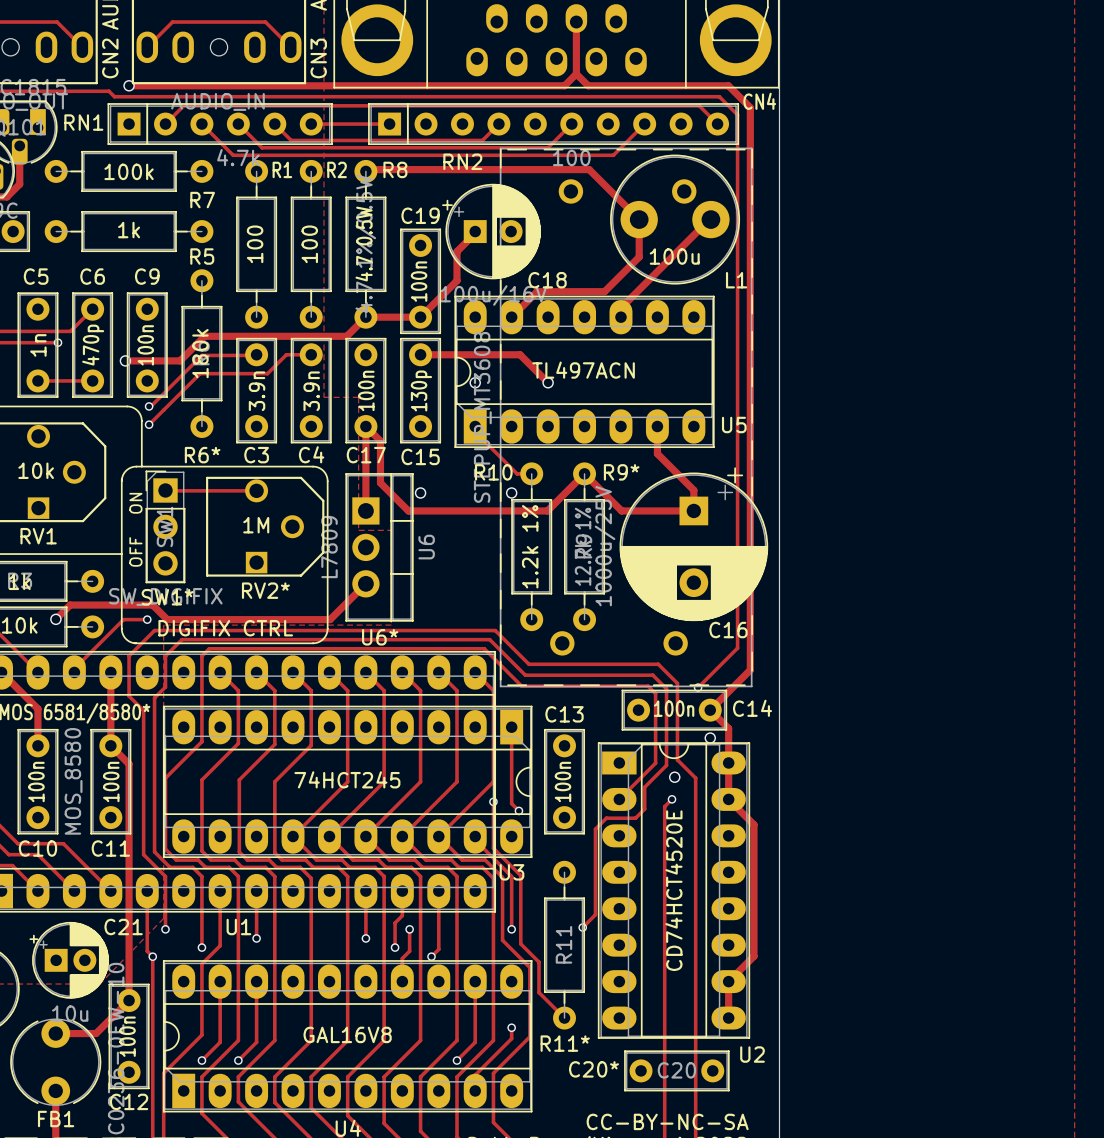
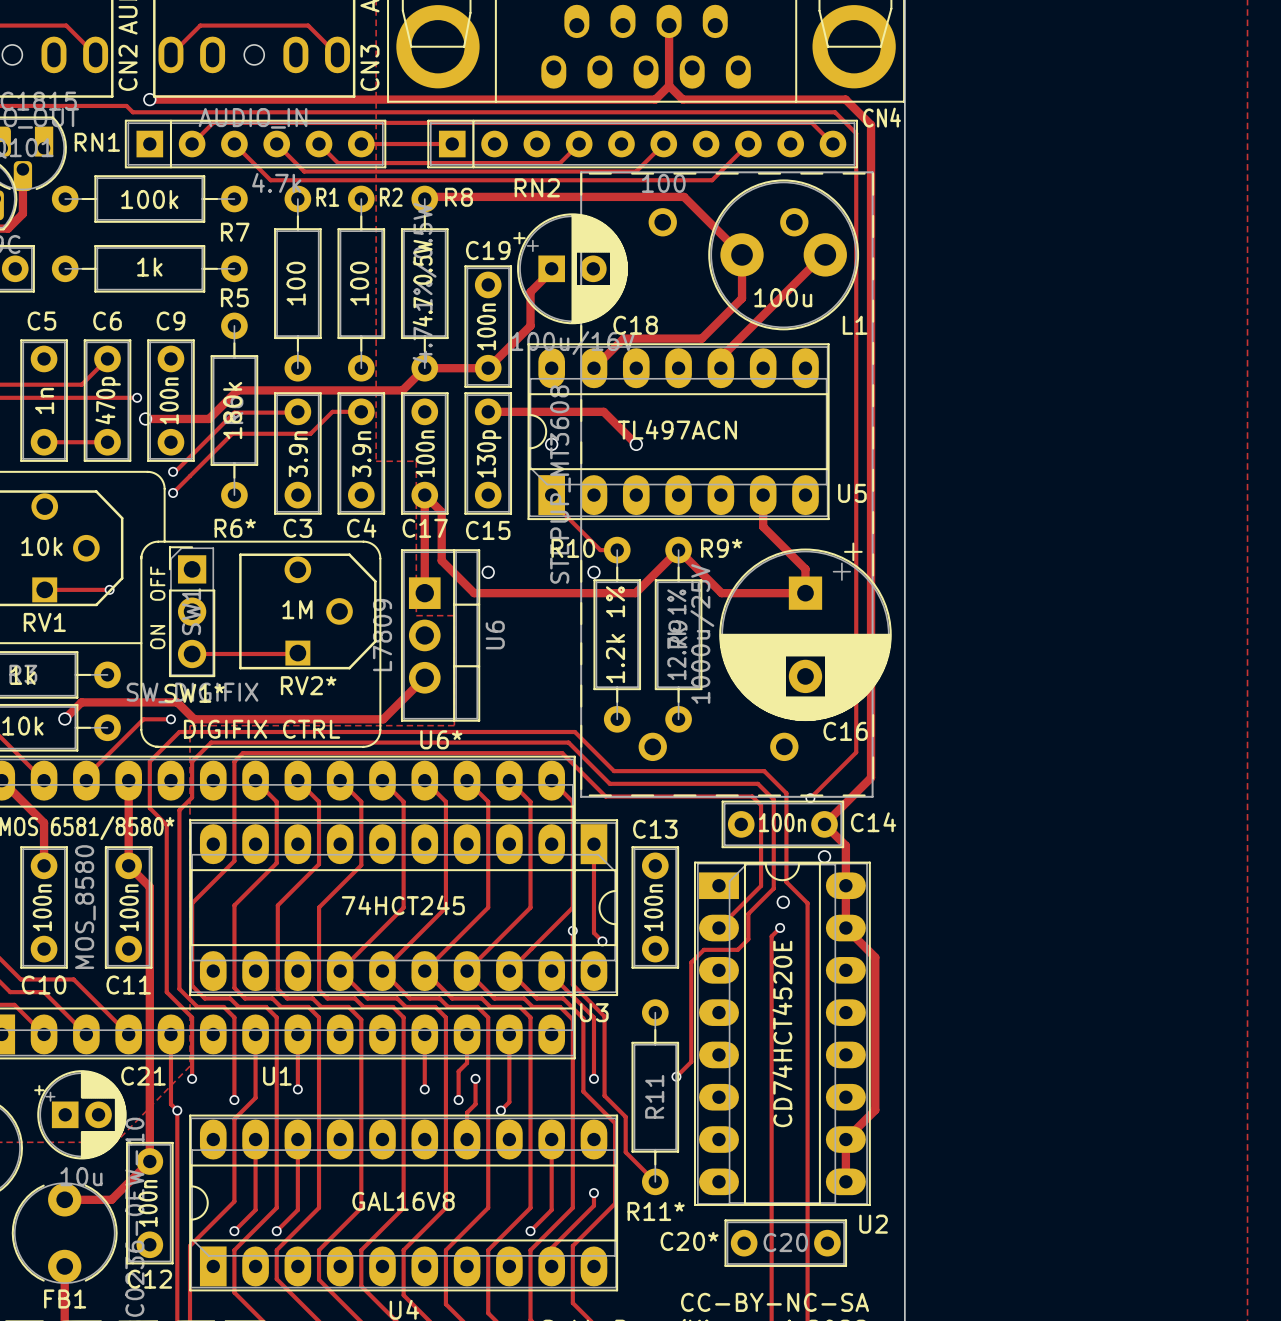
track: none -> (67, 397) (137, 397)
via position: (58, 342) -> (137, 397)
track: (165, 490) (256, 490) -> none
text: ON (135, 503) -> OFF (157, 583)
track: none -> (44, 589) (109, 589)
via: none -> (109, 589)
text: OFF (135, 551) -> ON (157, 637)
track: none -> (297, 653) (192, 653)

